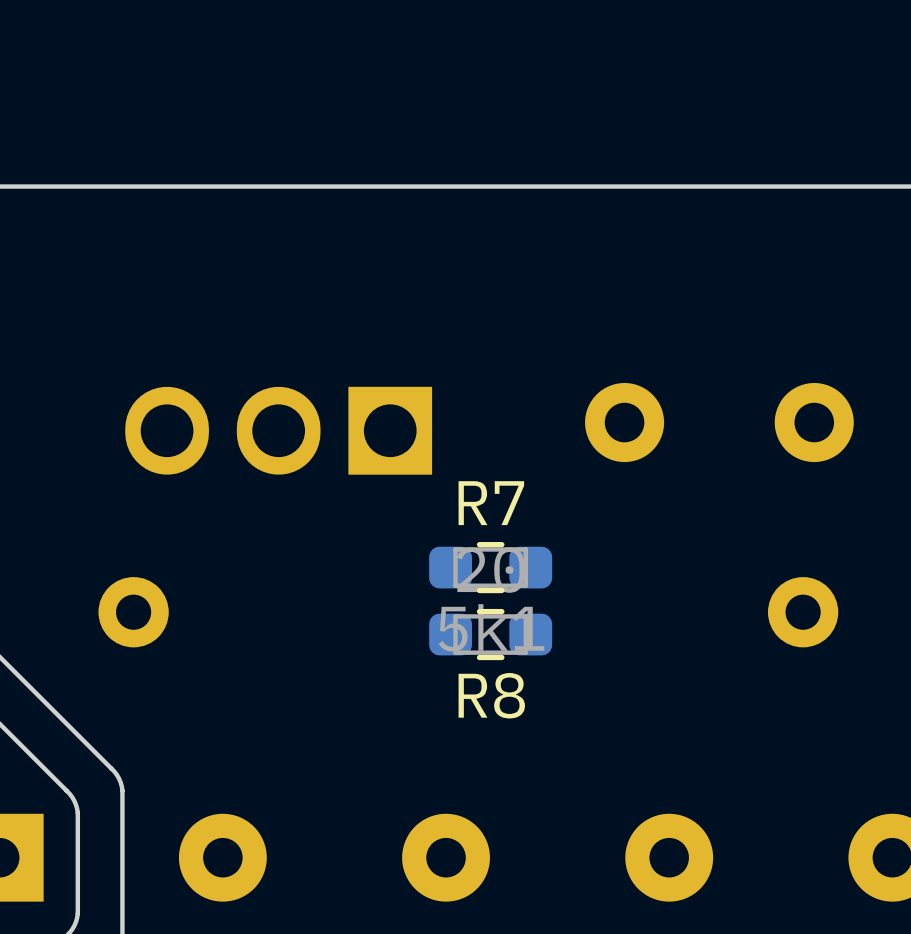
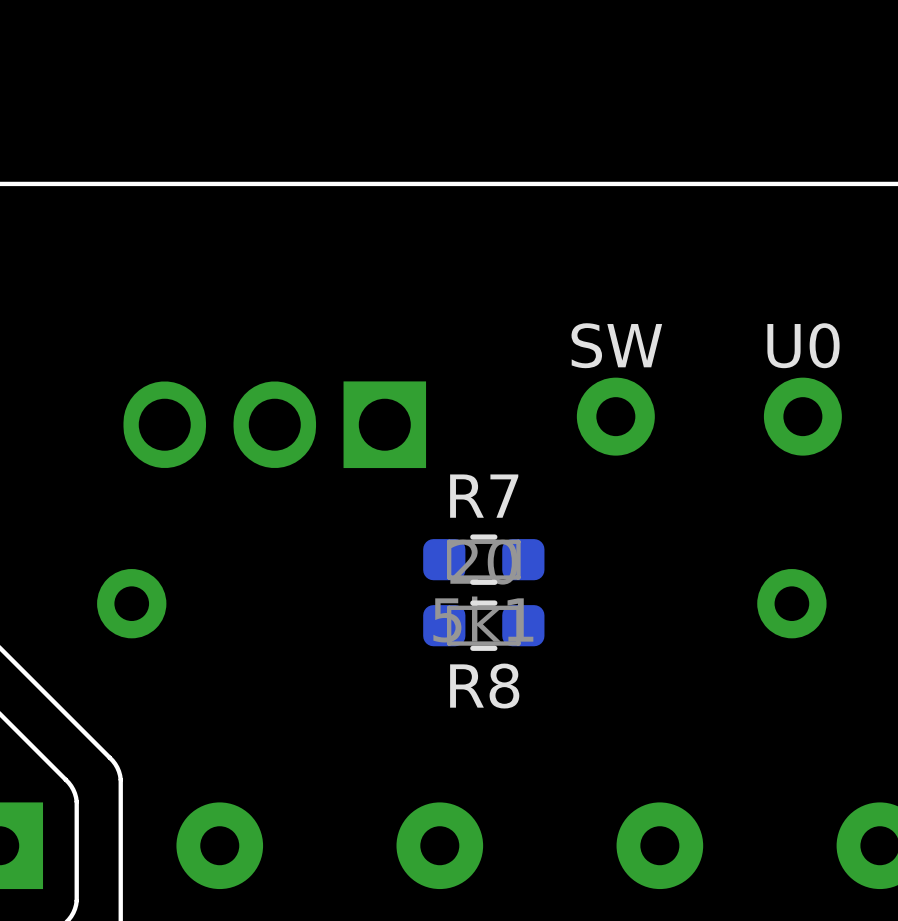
text: none -> SW (616, 345)
text: none -> U0 (803, 345)

